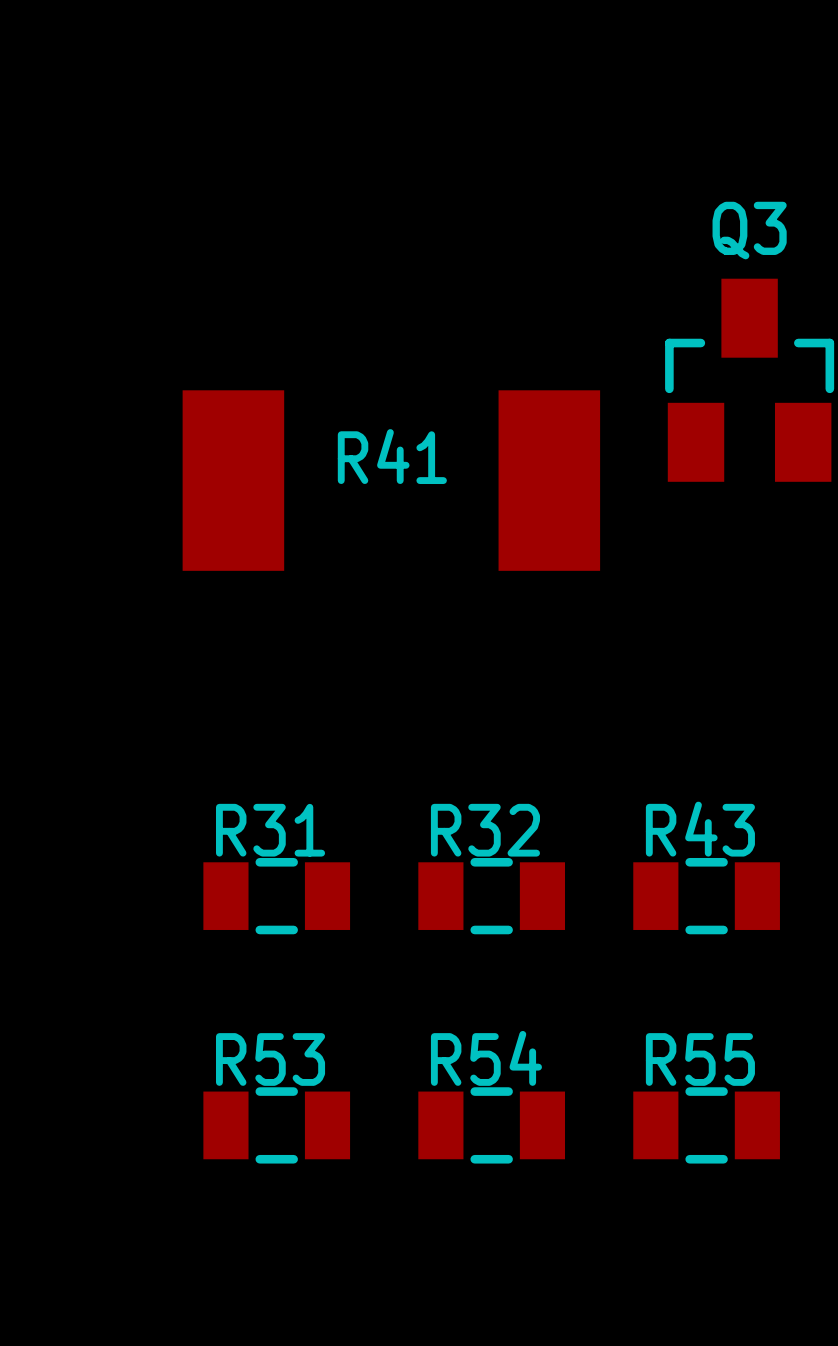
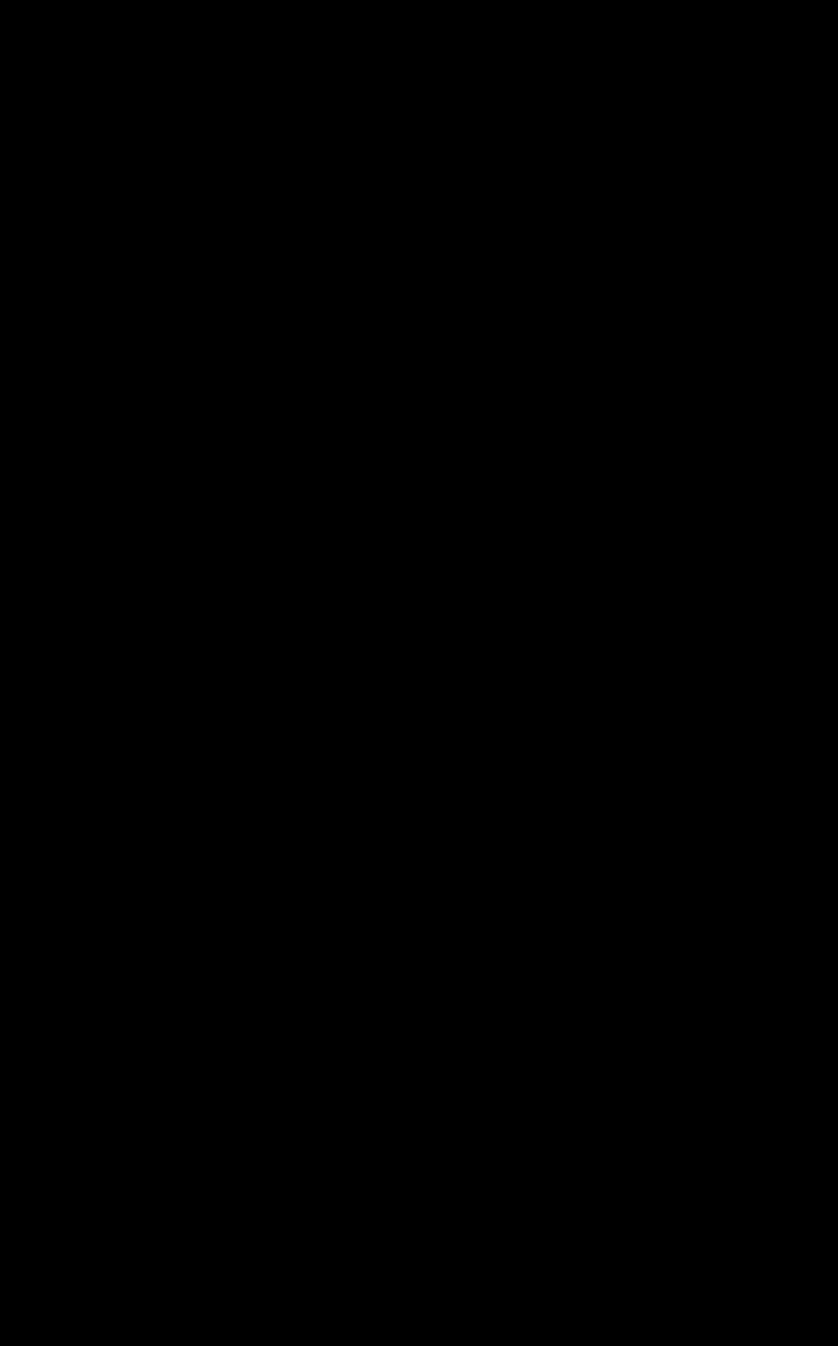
Q3: (749, 380) -> none
R41: (391, 480) -> none
R31: (276, 896) -> none
R32: (491, 896) -> none
R43: (706, 896) -> none
R53: (276, 1125) -> none
R54: (491, 1125) -> none
R55: (706, 1125) -> none

